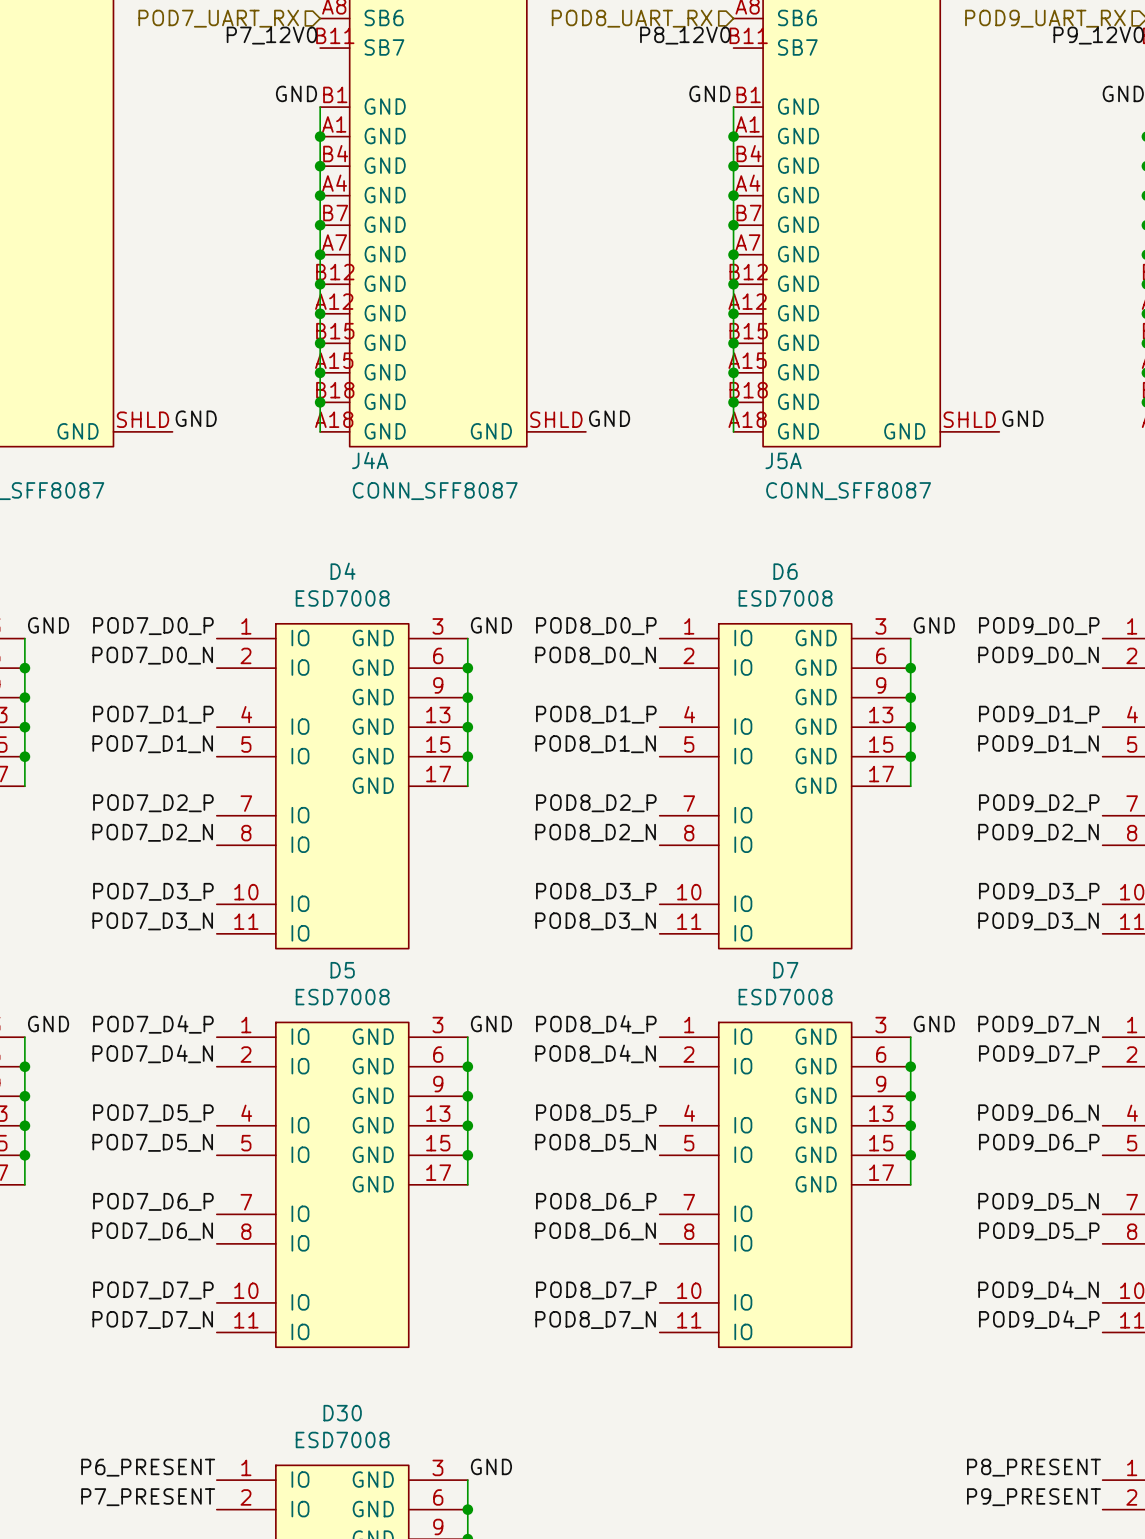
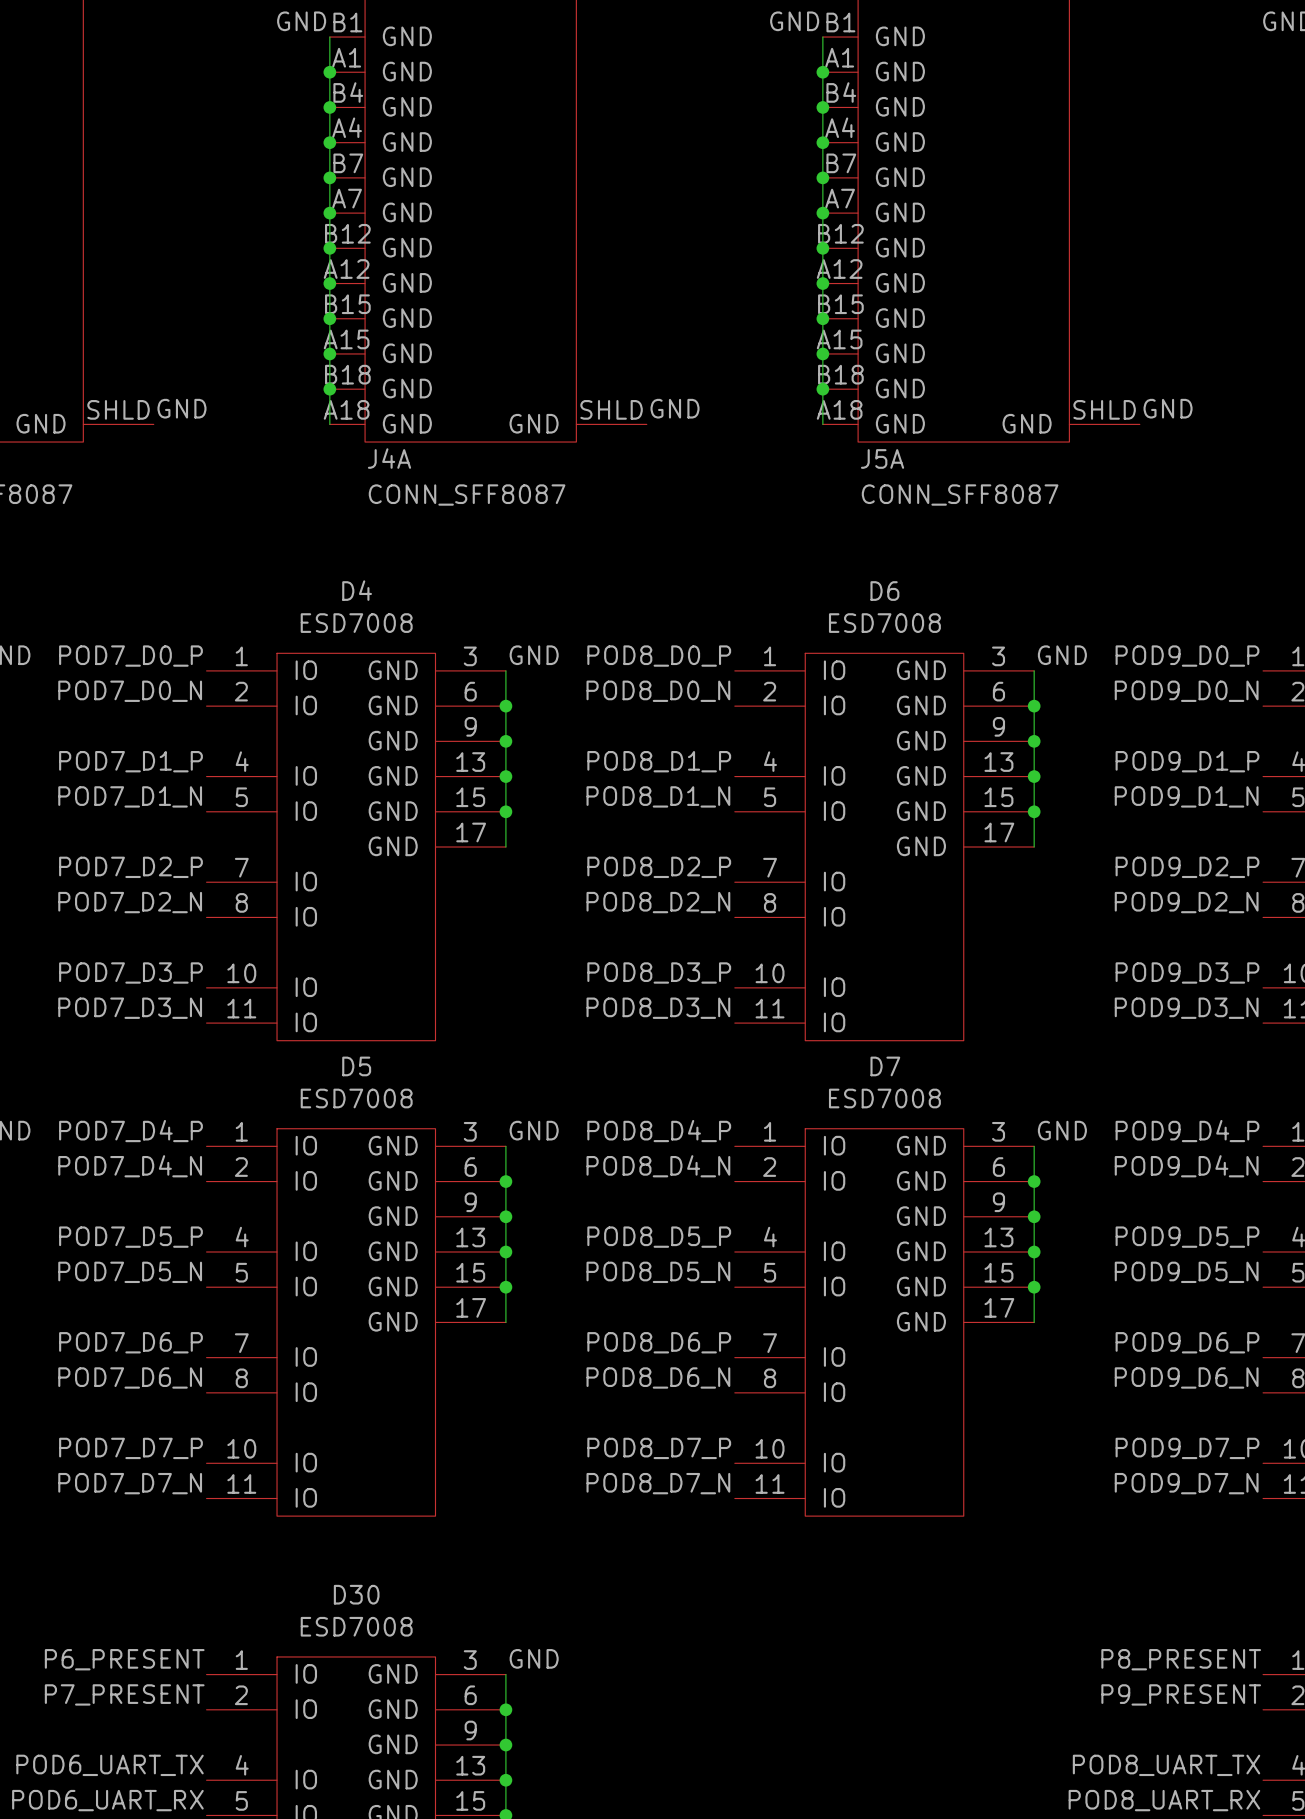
label: POD9_D7_N (1038, 1024) -> POD9_D4_P (1187, 1131)
label: POD9_D7_P (1039, 1054) -> POD9_D4_N (1186, 1166)
label: POD9_D6_N (1038, 1113) -> POD9_D5_P (1187, 1237)
label: POD9_D6_P (1039, 1142) -> POD9_D5_N (1186, 1272)
label: POD9_D5_N (1038, 1201) -> POD9_D6_P (1187, 1342)
label: POD9_D5_P (1039, 1231) -> POD9_D6_N (1186, 1377)
label: POD9_D4_N (1038, 1290) -> POD9_D7_P (1187, 1448)
label: POD9_D4_P (1039, 1319) -> POD9_D7_N (1186, 1483)

